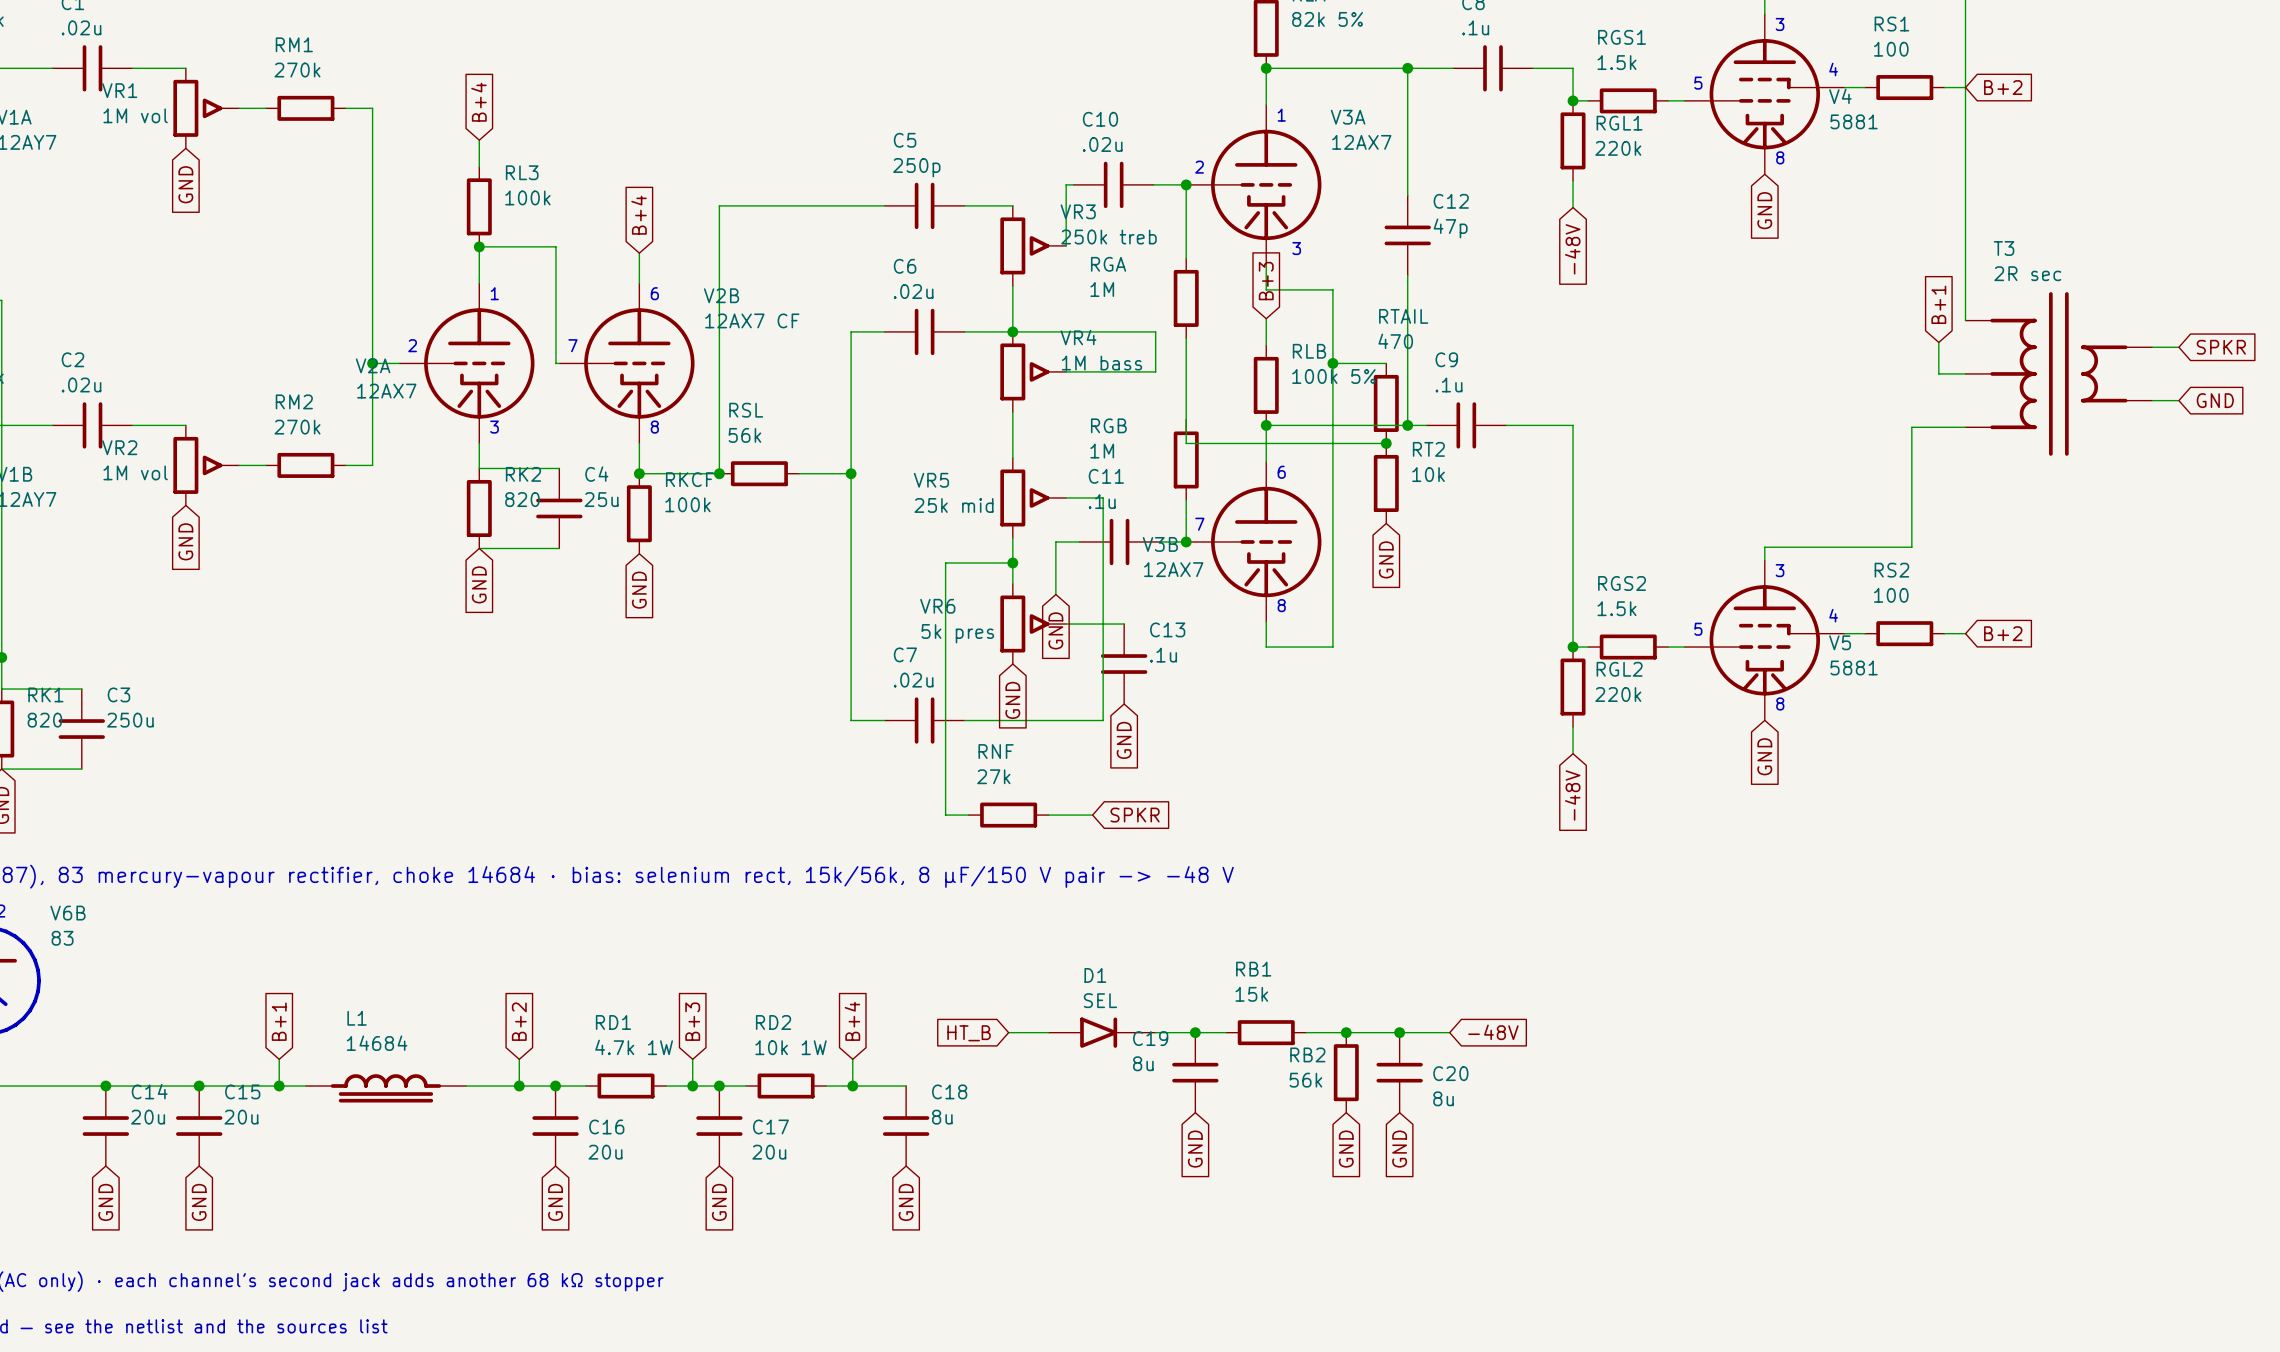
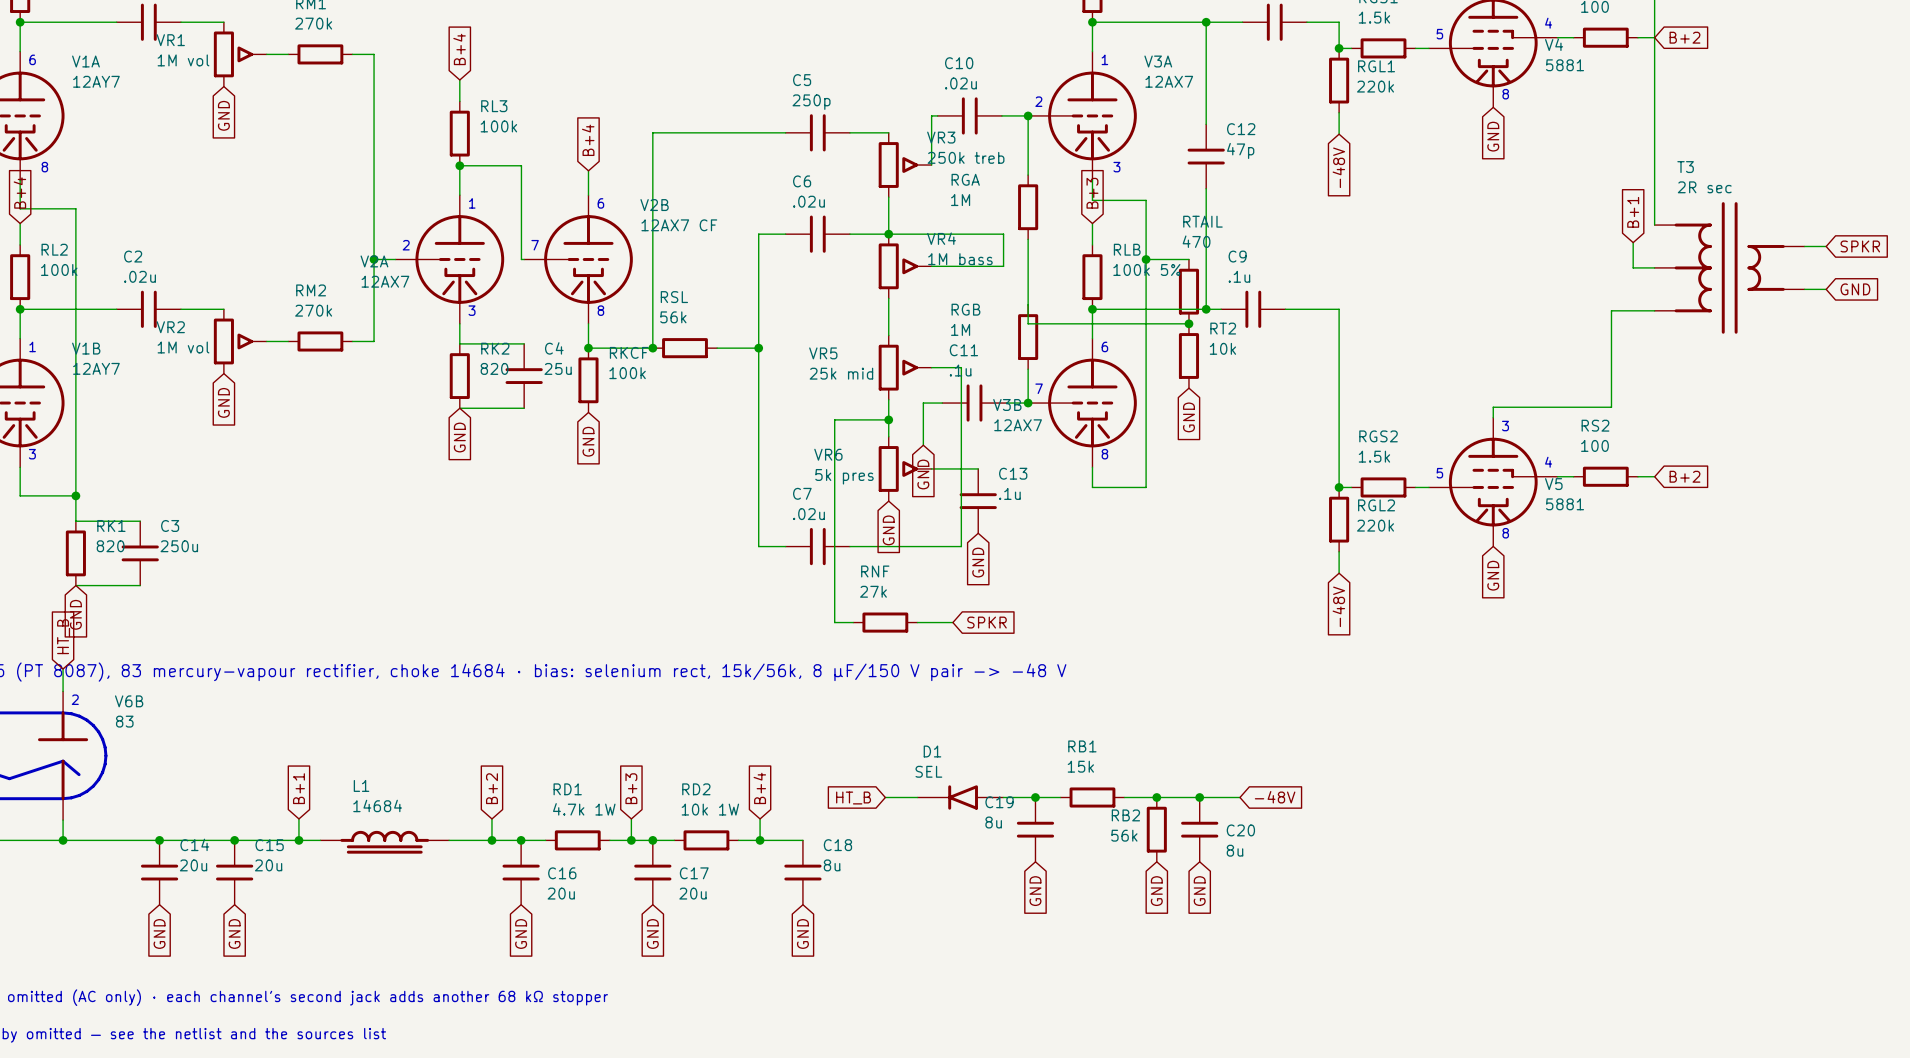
D1 name position: D1 (1095, 975) -> D1 (932, 751)
D1 value position: SEL (1100, 1000) -> SEL (928, 771)
D1 rotation: 0° (1098, 1032) -> 180° (963, 797)

